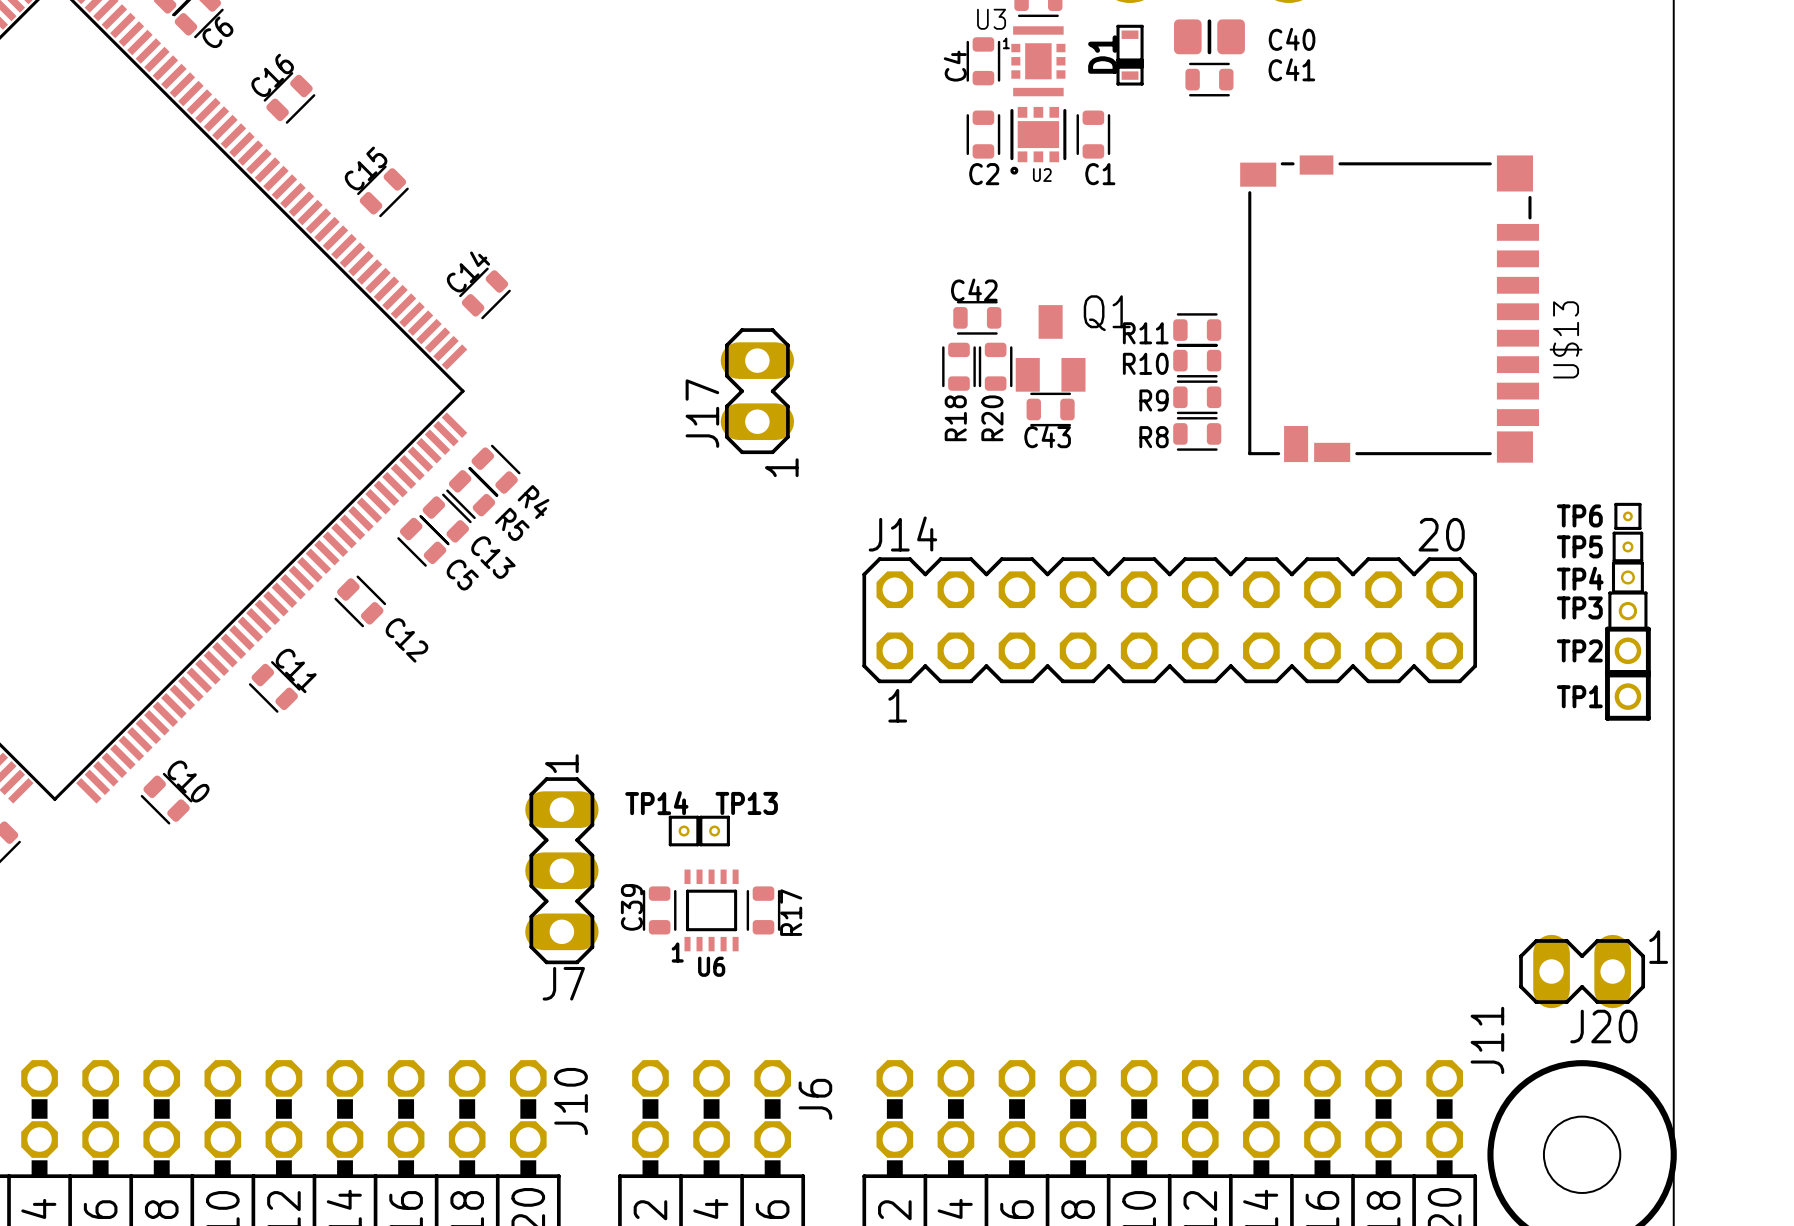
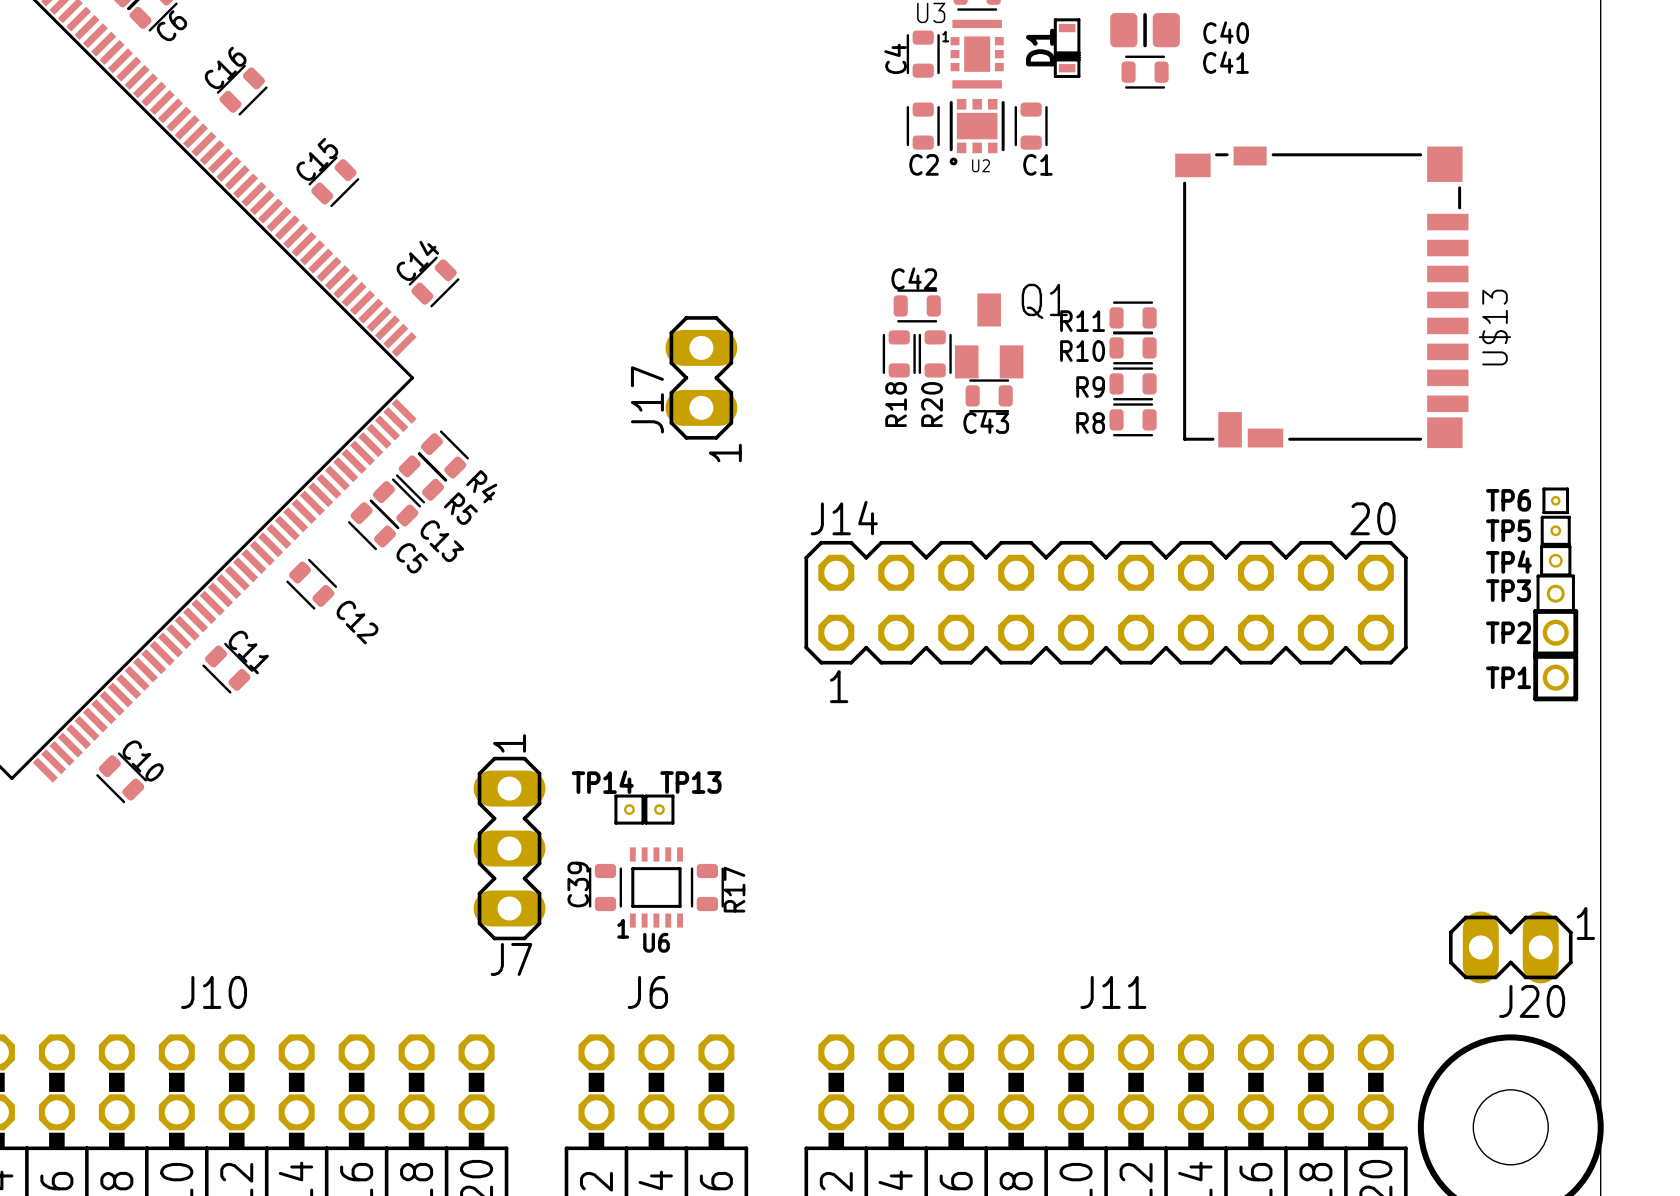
J11 name rotation: 0° (1487, 1040) -> 90° clockwise (1113, 992)
J11 name position: J11 (1487, 1040) -> J11 (1113, 992)
J6 name rotation: 0° (815, 1099) -> 90° clockwise (647, 992)
J6 name position: J6 (815, 1099) -> J6 (647, 992)
J10 name rotation: 0° (571, 1101) -> 90° clockwise (214, 992)
J10 name position: J10 (571, 1101) -> J10 (214, 992)

